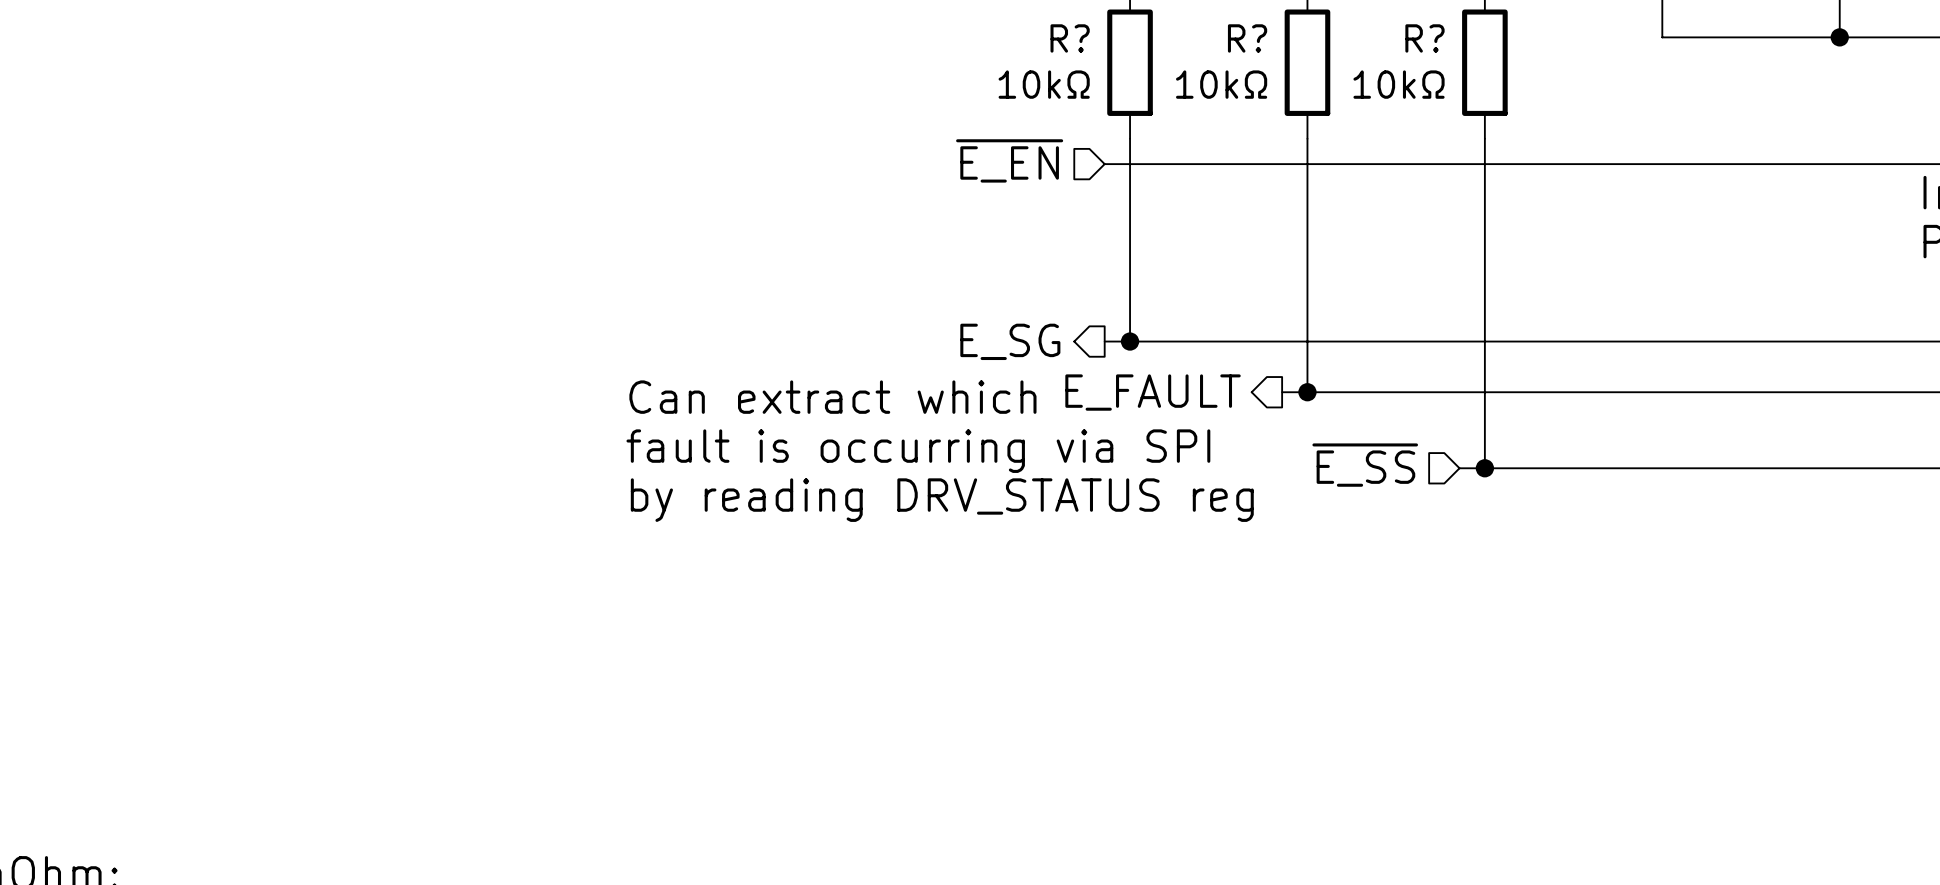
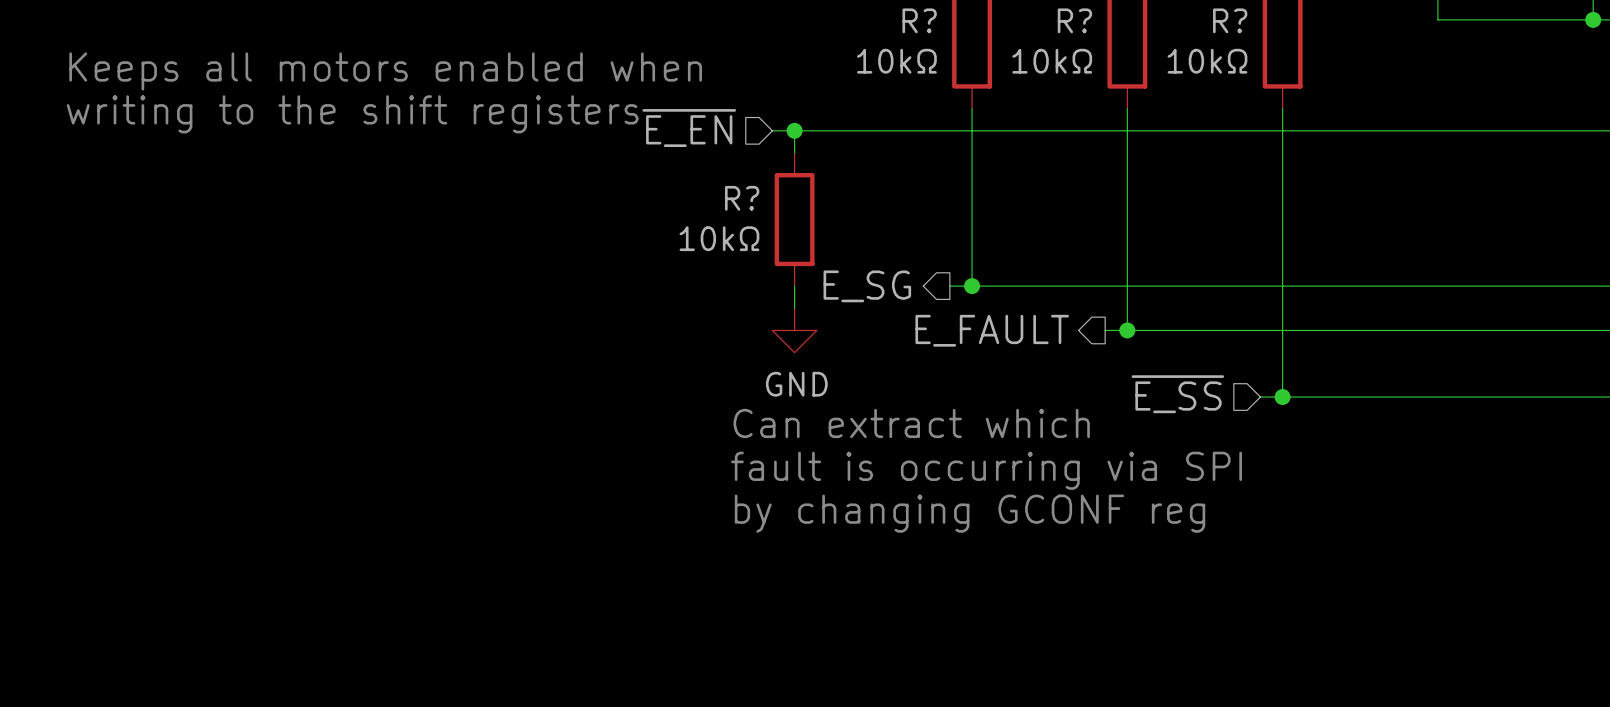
text: none -> Keeps all motors enabled when (385, 71)
text: none -> writing to the shift registers (352, 114)
hierarchical label position: ~{E_EN} (1009, 160) -> ~{E_EN} (689, 128)
wire: none -> (772, 130) (949, 130)
wire: none -> (794, 130) (794, 153)
junction: none -> (794, 130)
R?: none -> 10kΩ (794, 219)
wire: none -> (794, 286) (794, 308)
power symbol: none -> GND (794, 330)
text position: Can extract which (832, 397) -> Can extract which (911, 423)
text position: fault is occurring via SPI (918, 451) -> fault is occurring via SPI (986, 470)
text: by reading DRV_STATUS reg (942, 500) -> none
text: none -> by changing GCONF reg (970, 513)

